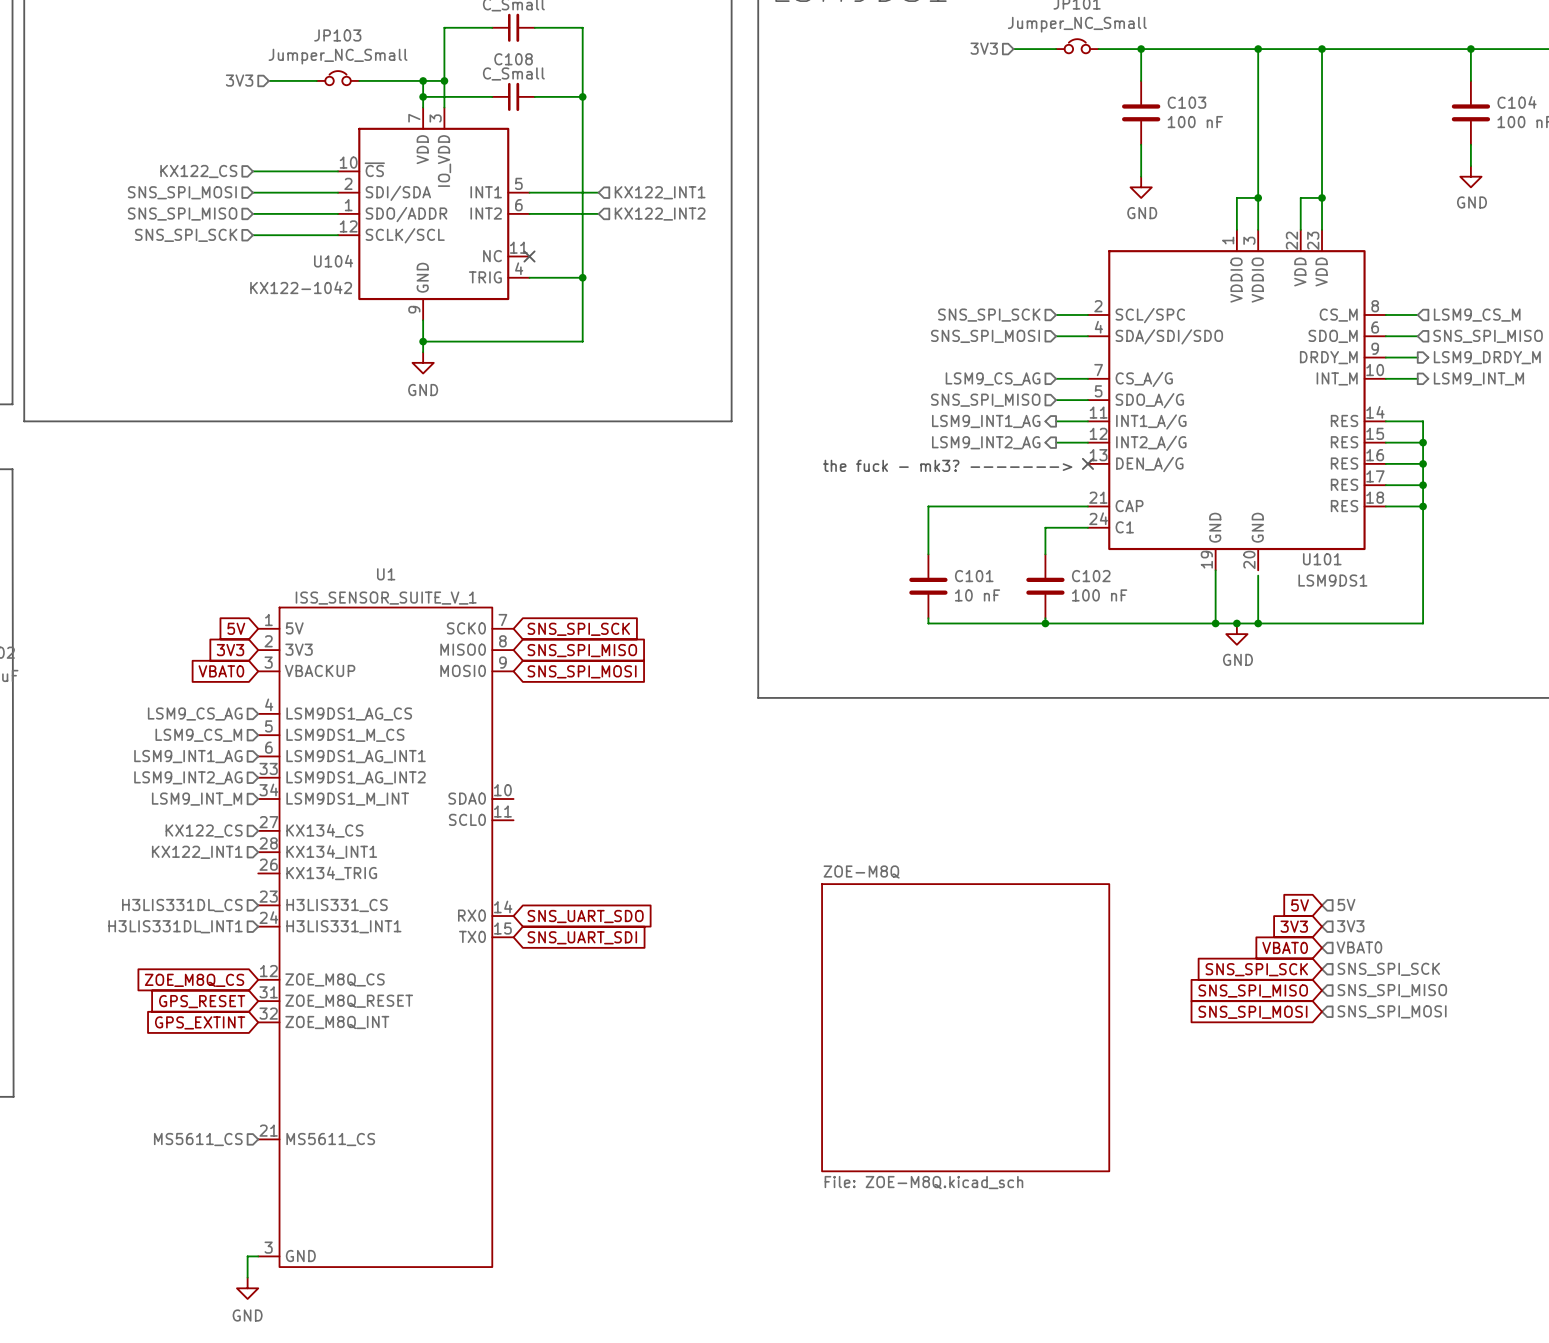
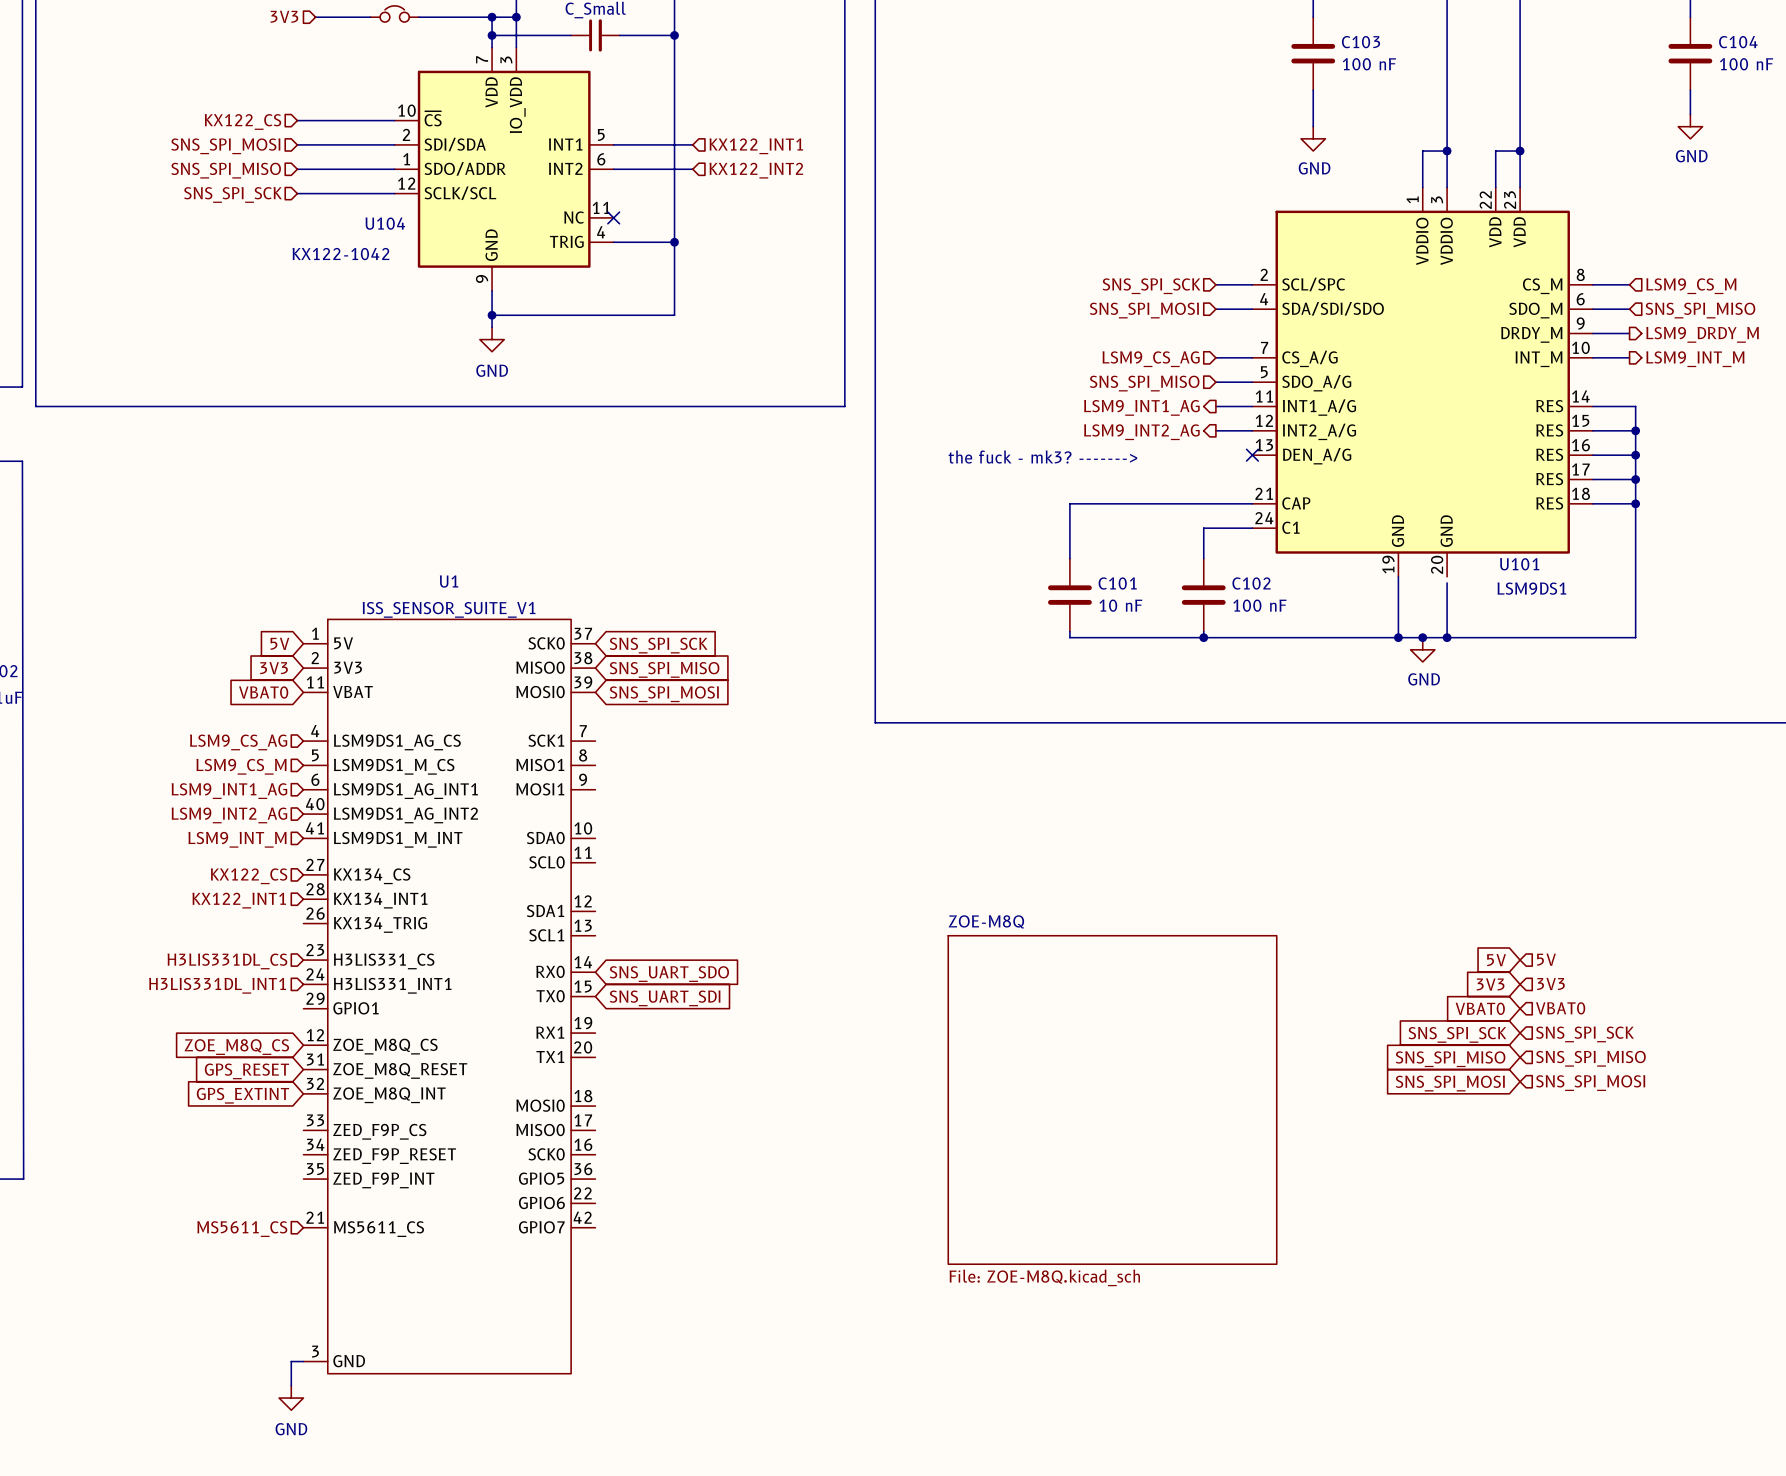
U1 value: ISS_SENSOR_SUITE_V_1 (386, 598) -> ISS_SENSOR_SUITE_V1 (449, 609)
U1 symbol: [258, 606, 514, 1268] -> [303, 618, 596, 1375]

